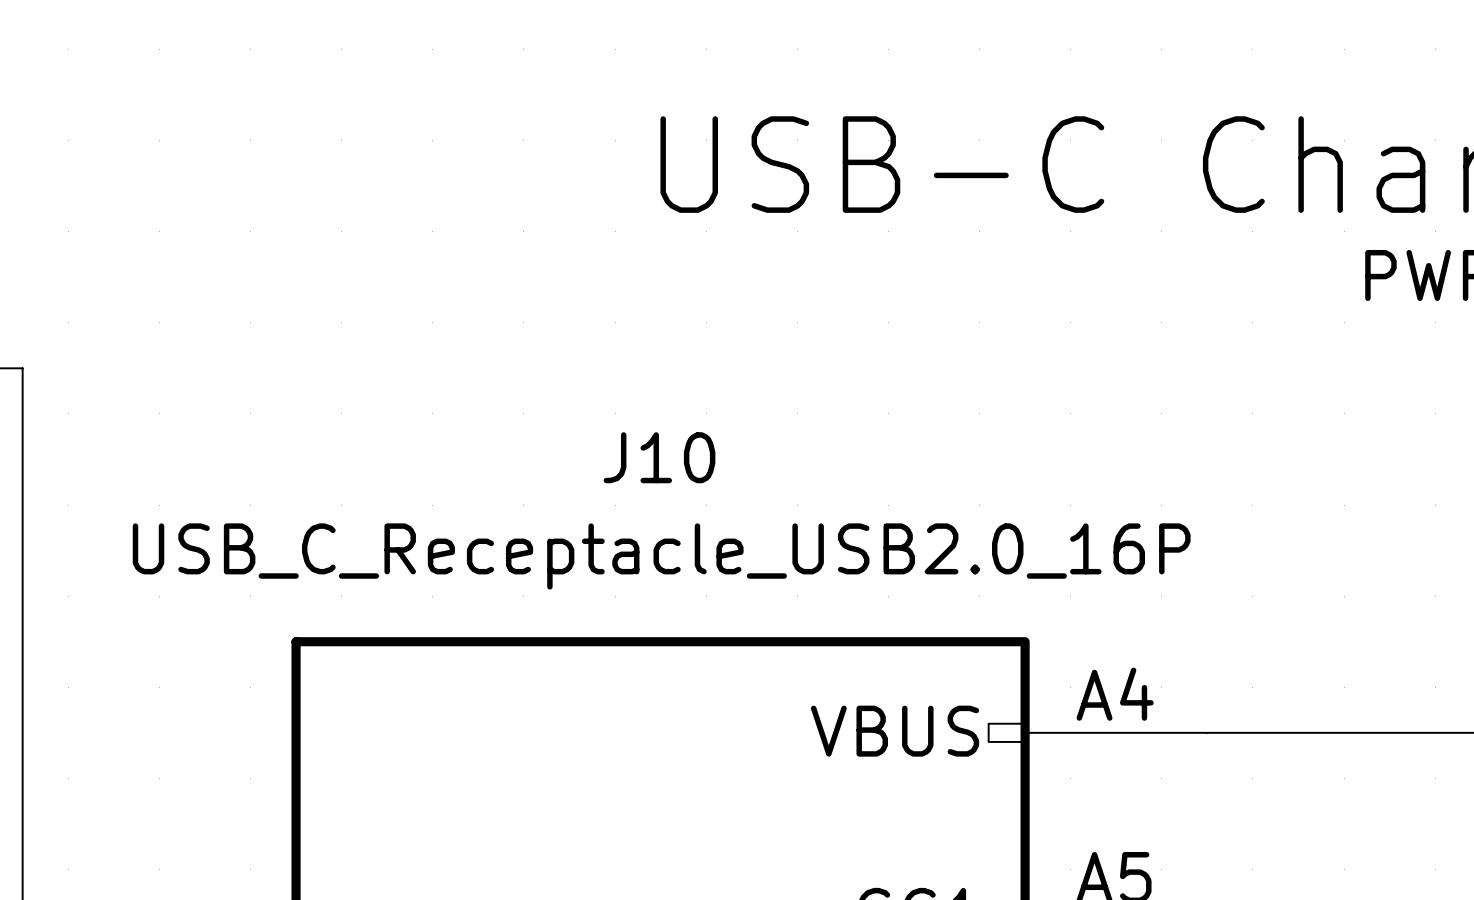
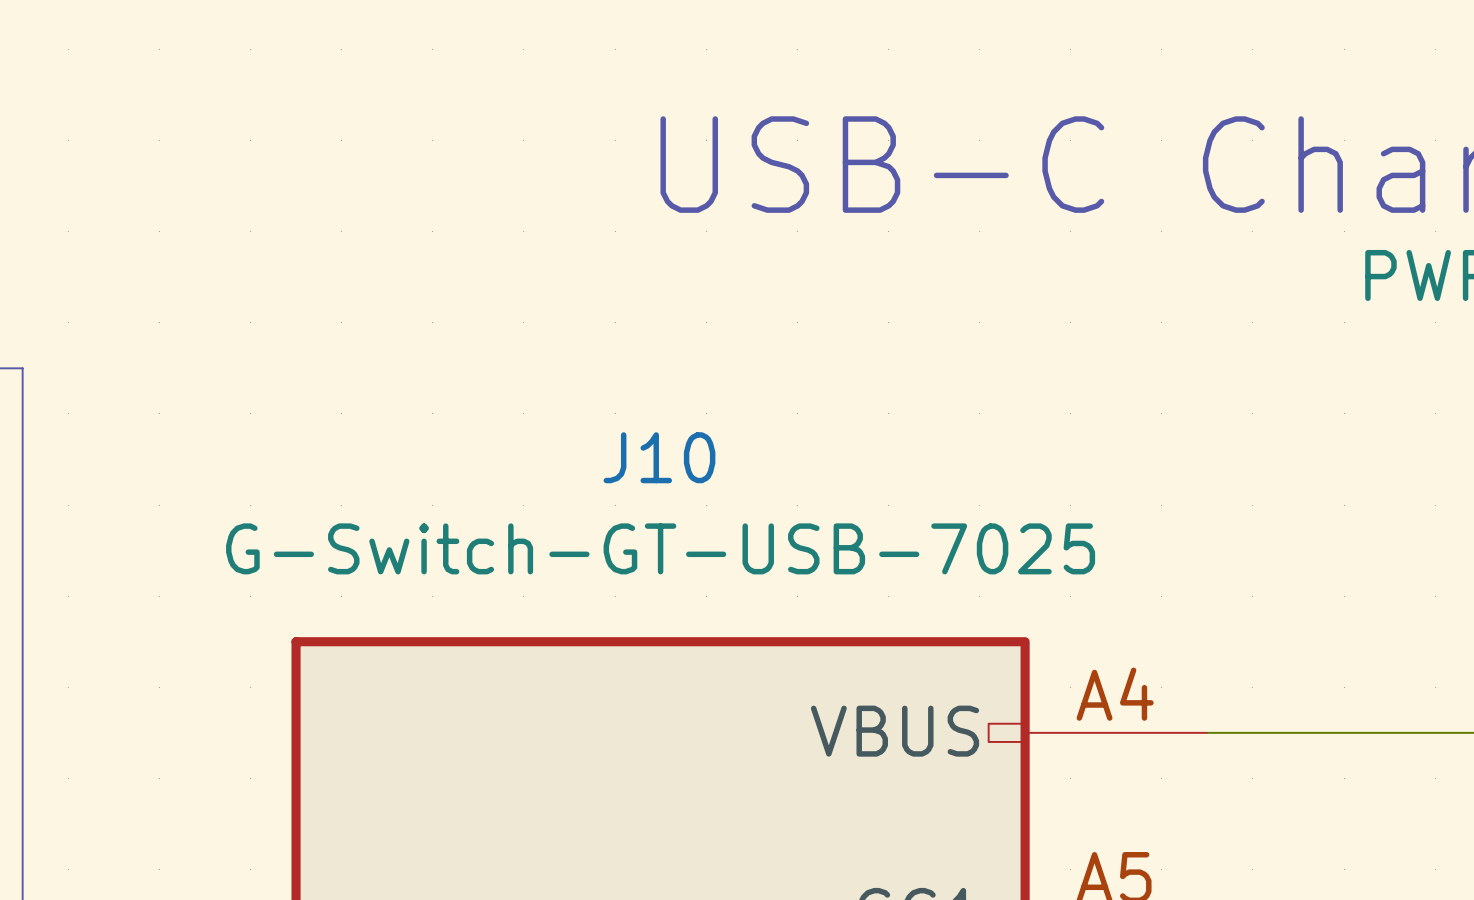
J10 value: USB_C_Receptacle_USB2.0_16P (661, 556) -> G-Switch-GT-USB-7025 (660, 548)

